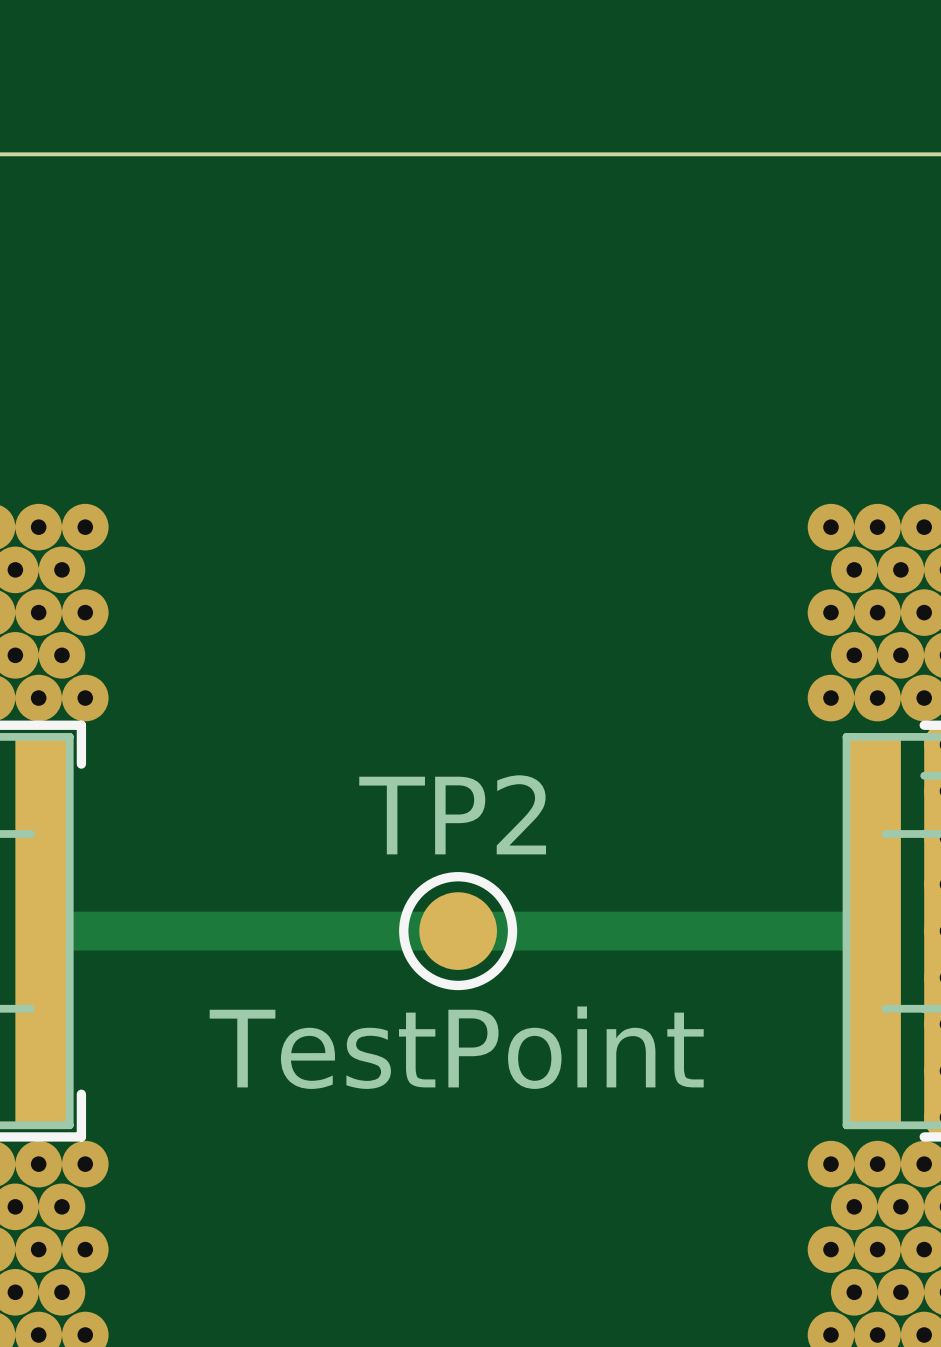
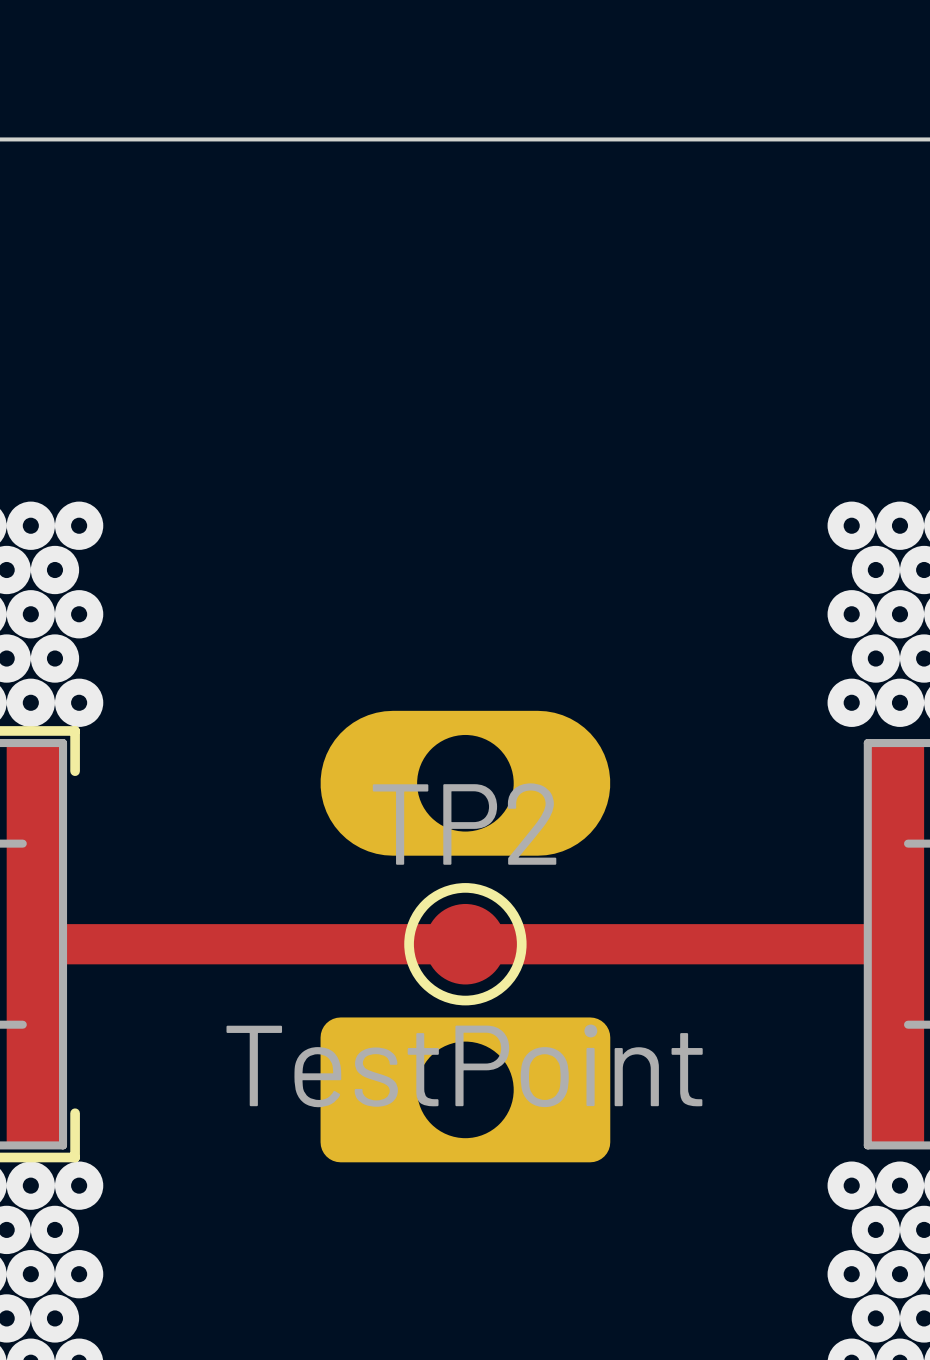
part: none -> (465, 936)

